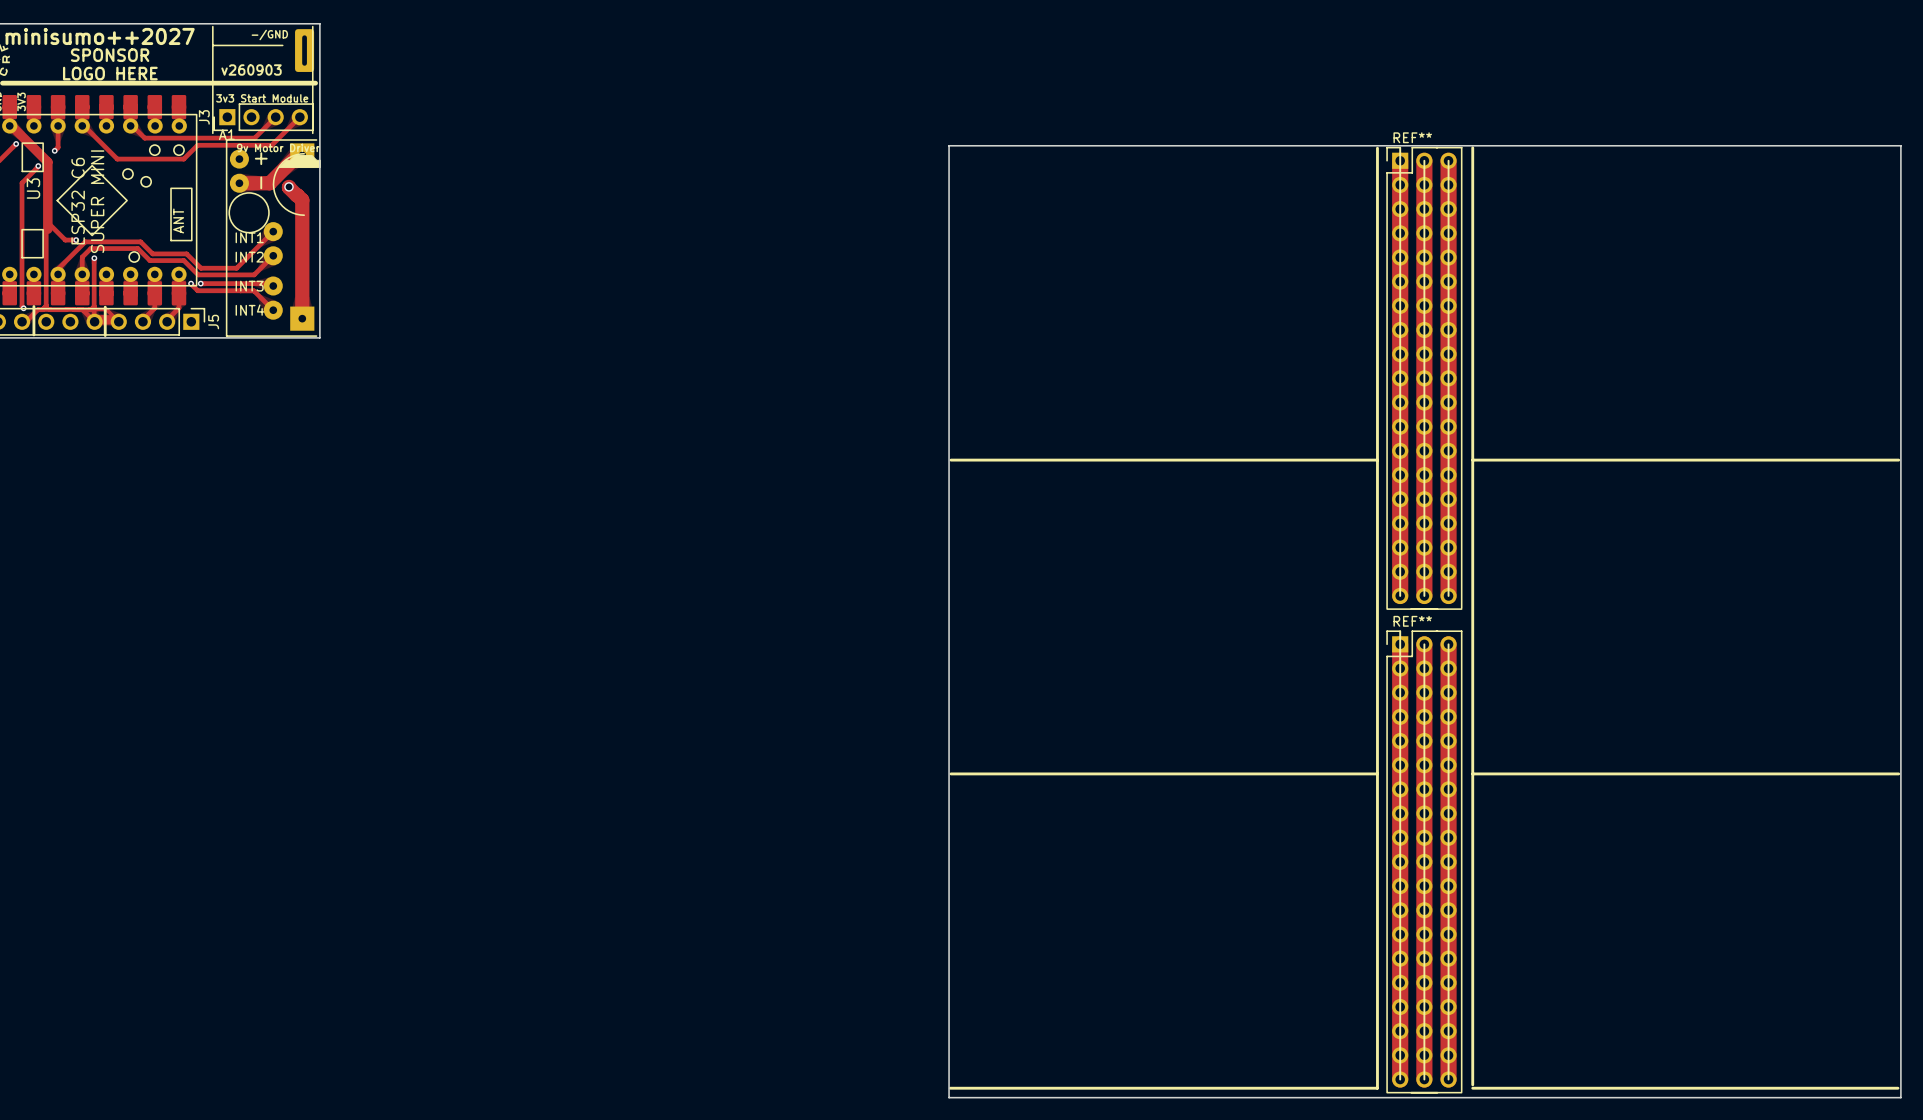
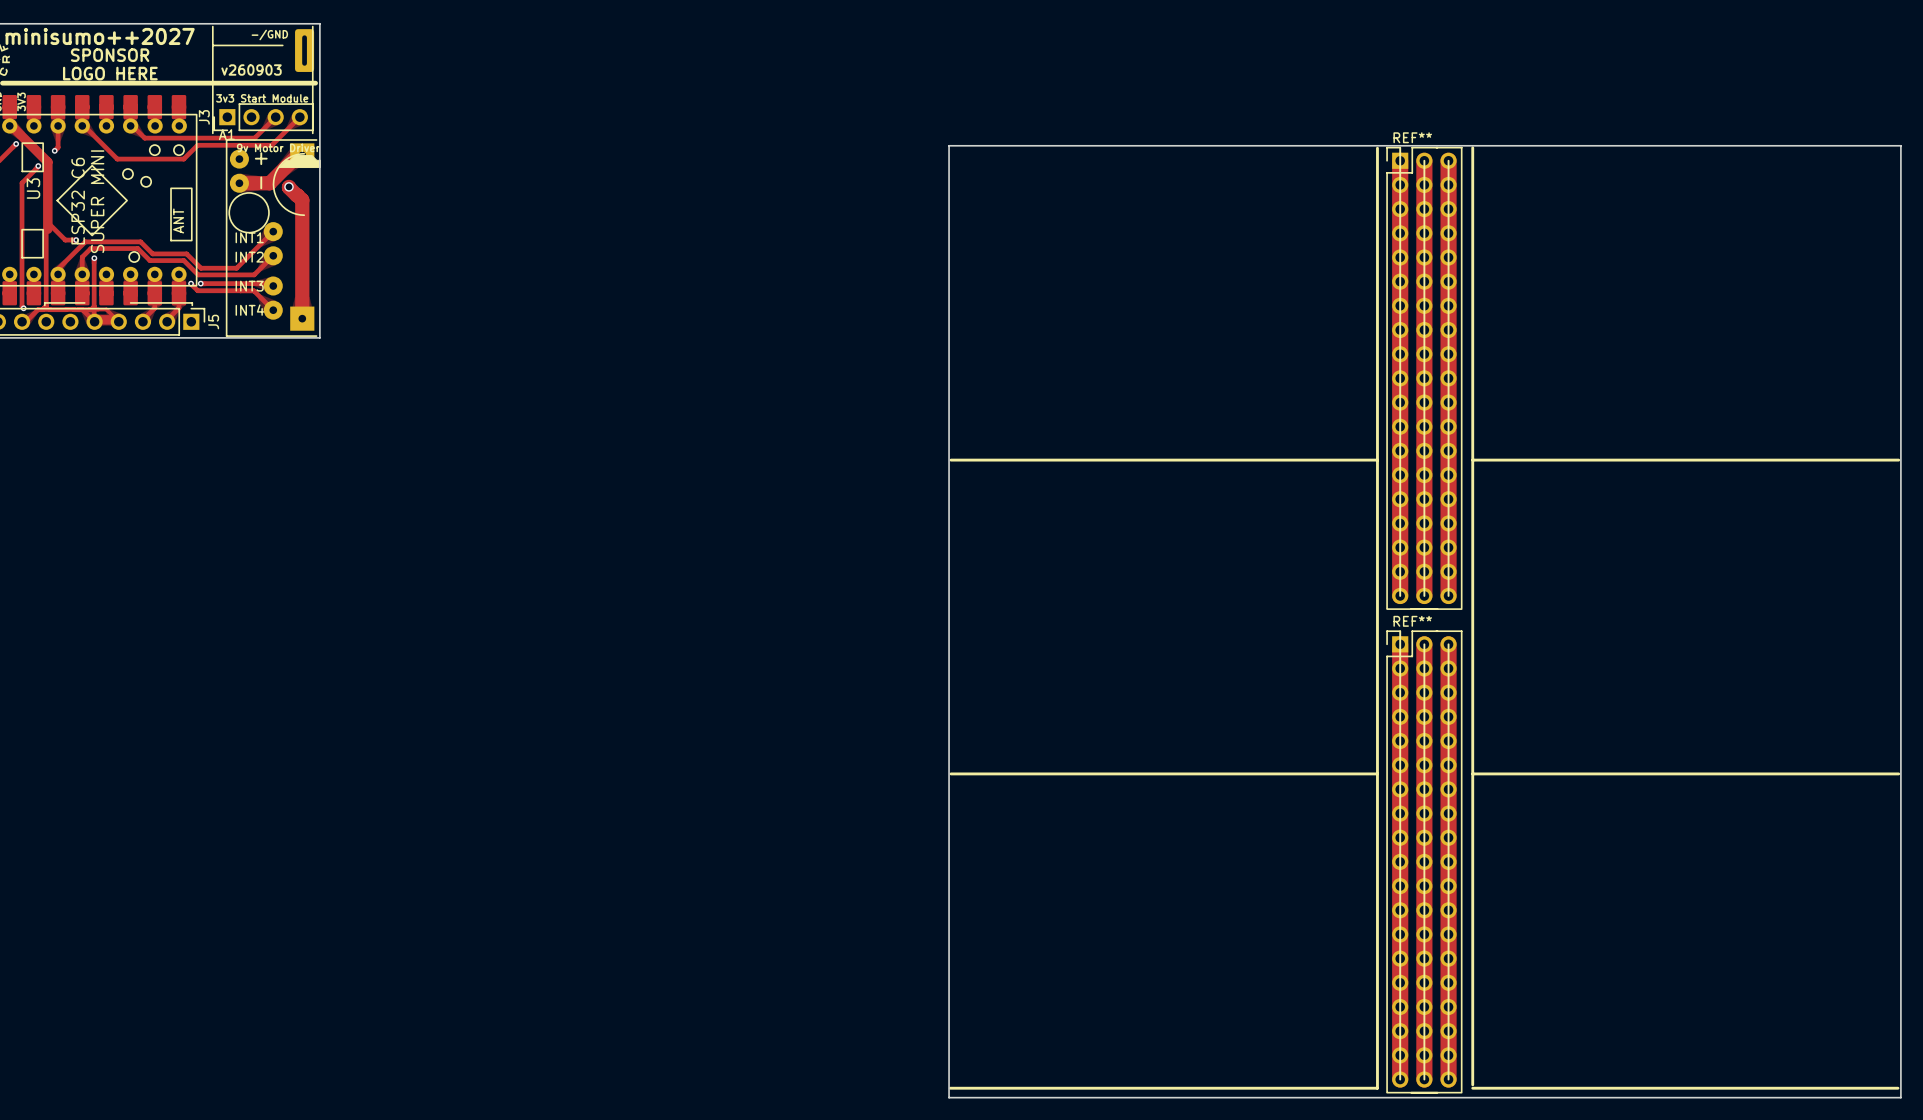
line: none -> (84, 302) (44, 302) (44, 305)
line: none -> (130, 302) (192, 302) (192, 305)
line: (33, 306) (33, 334) -> none
line: (105, 307) (105, 335) -> none

